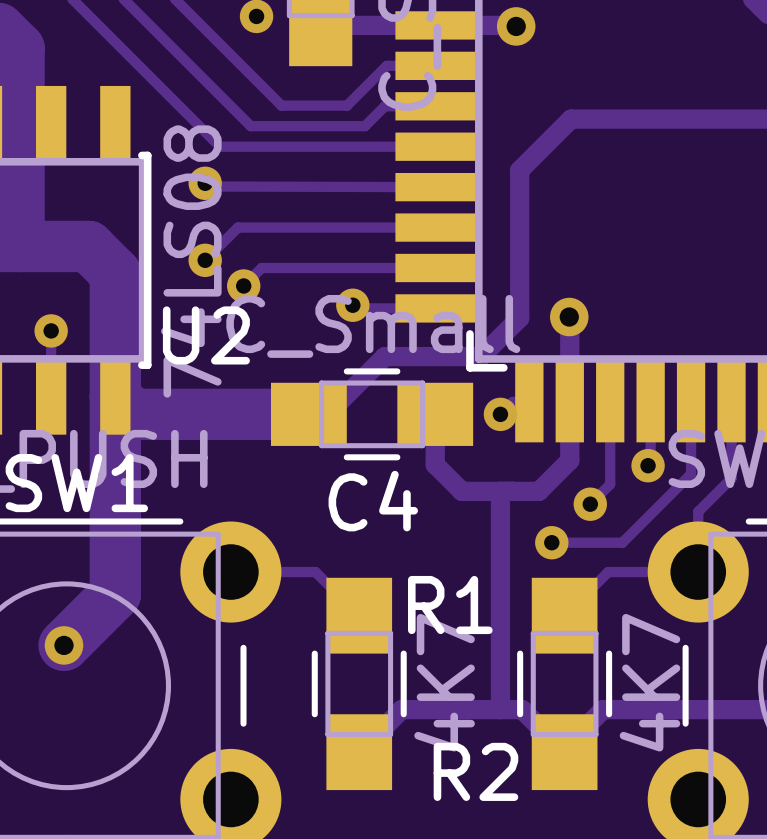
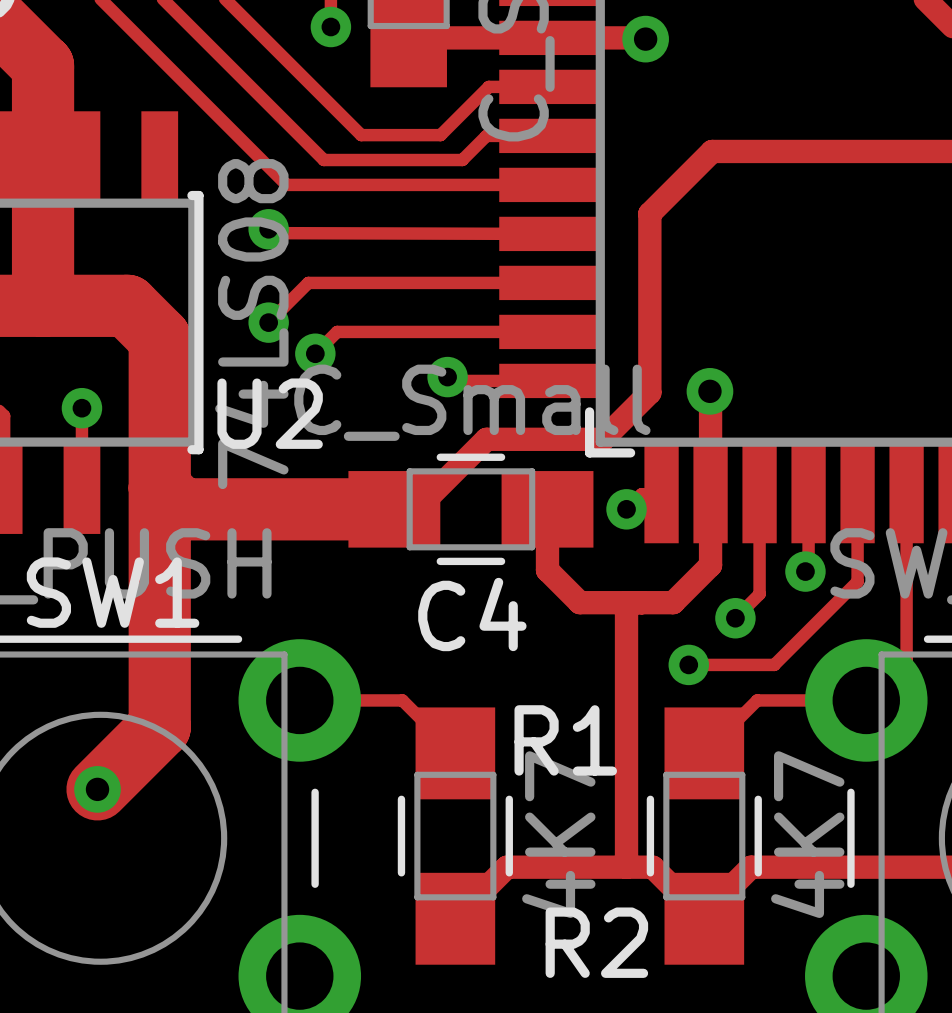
track: (731, 478) (698, 511) (698, 572) -> (906, 587) (906, 660) (866, 700)

